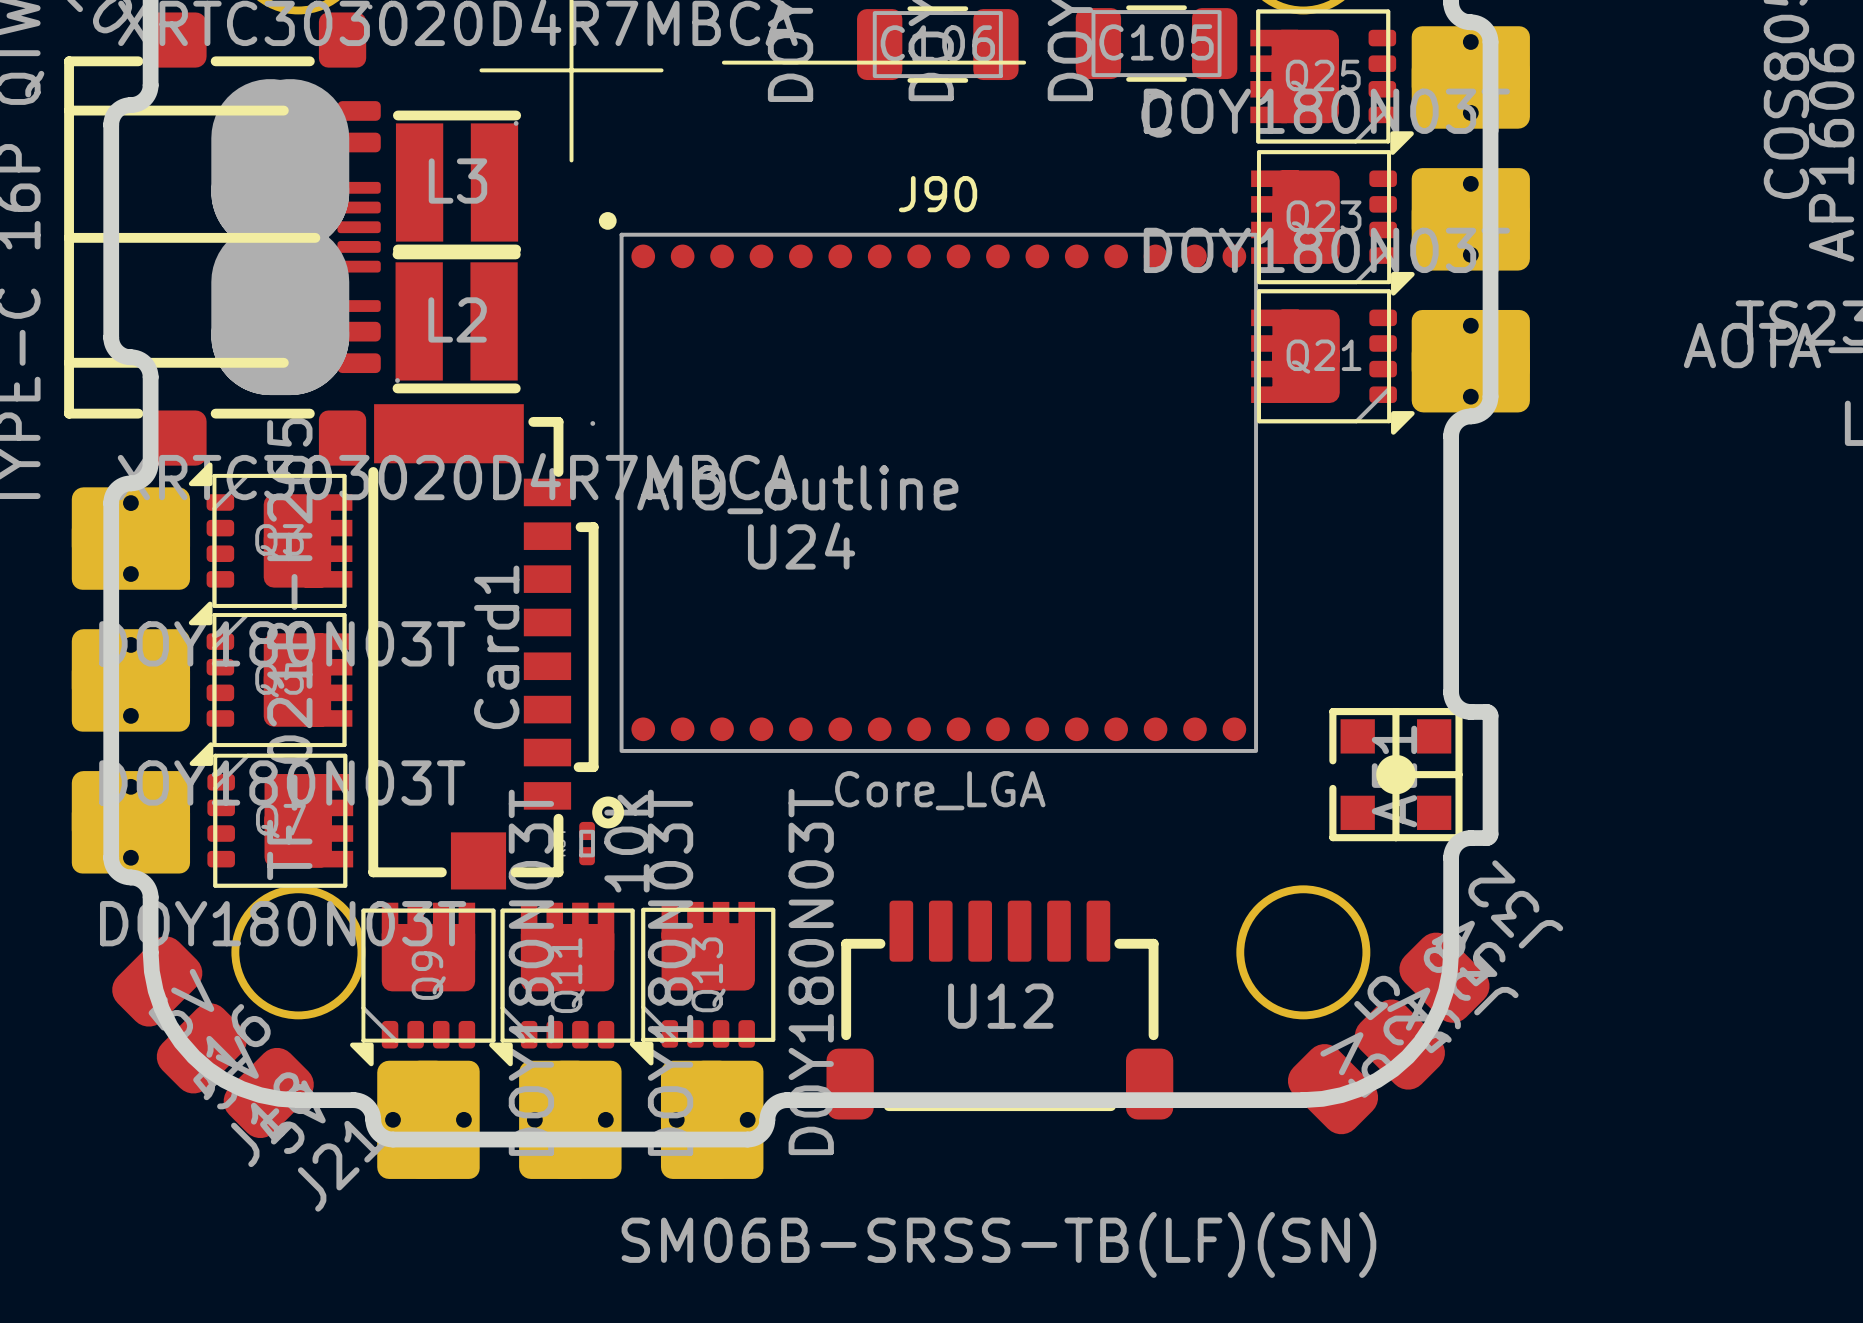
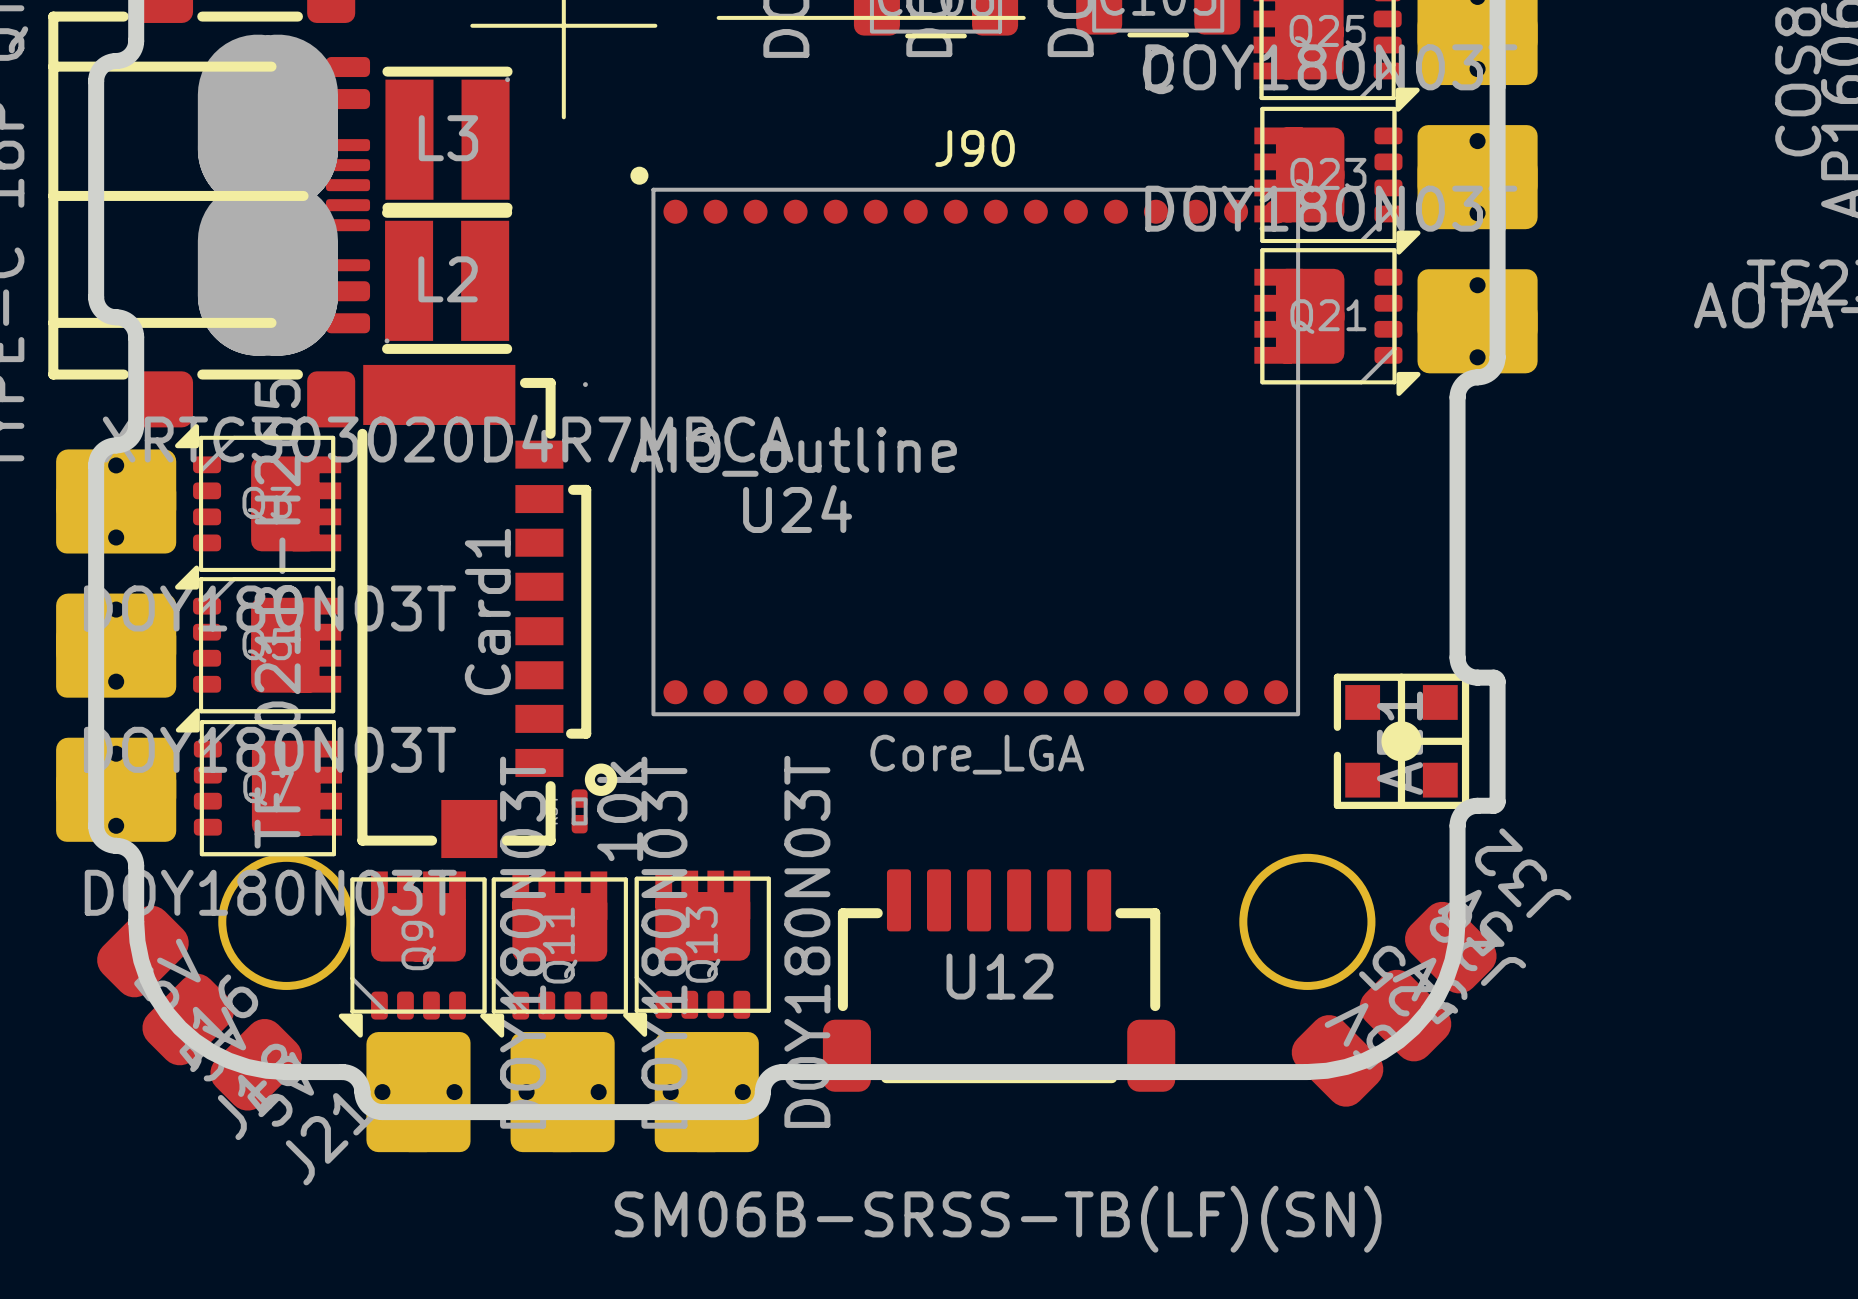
J90 position: (928, 482) -> (965, 441)

